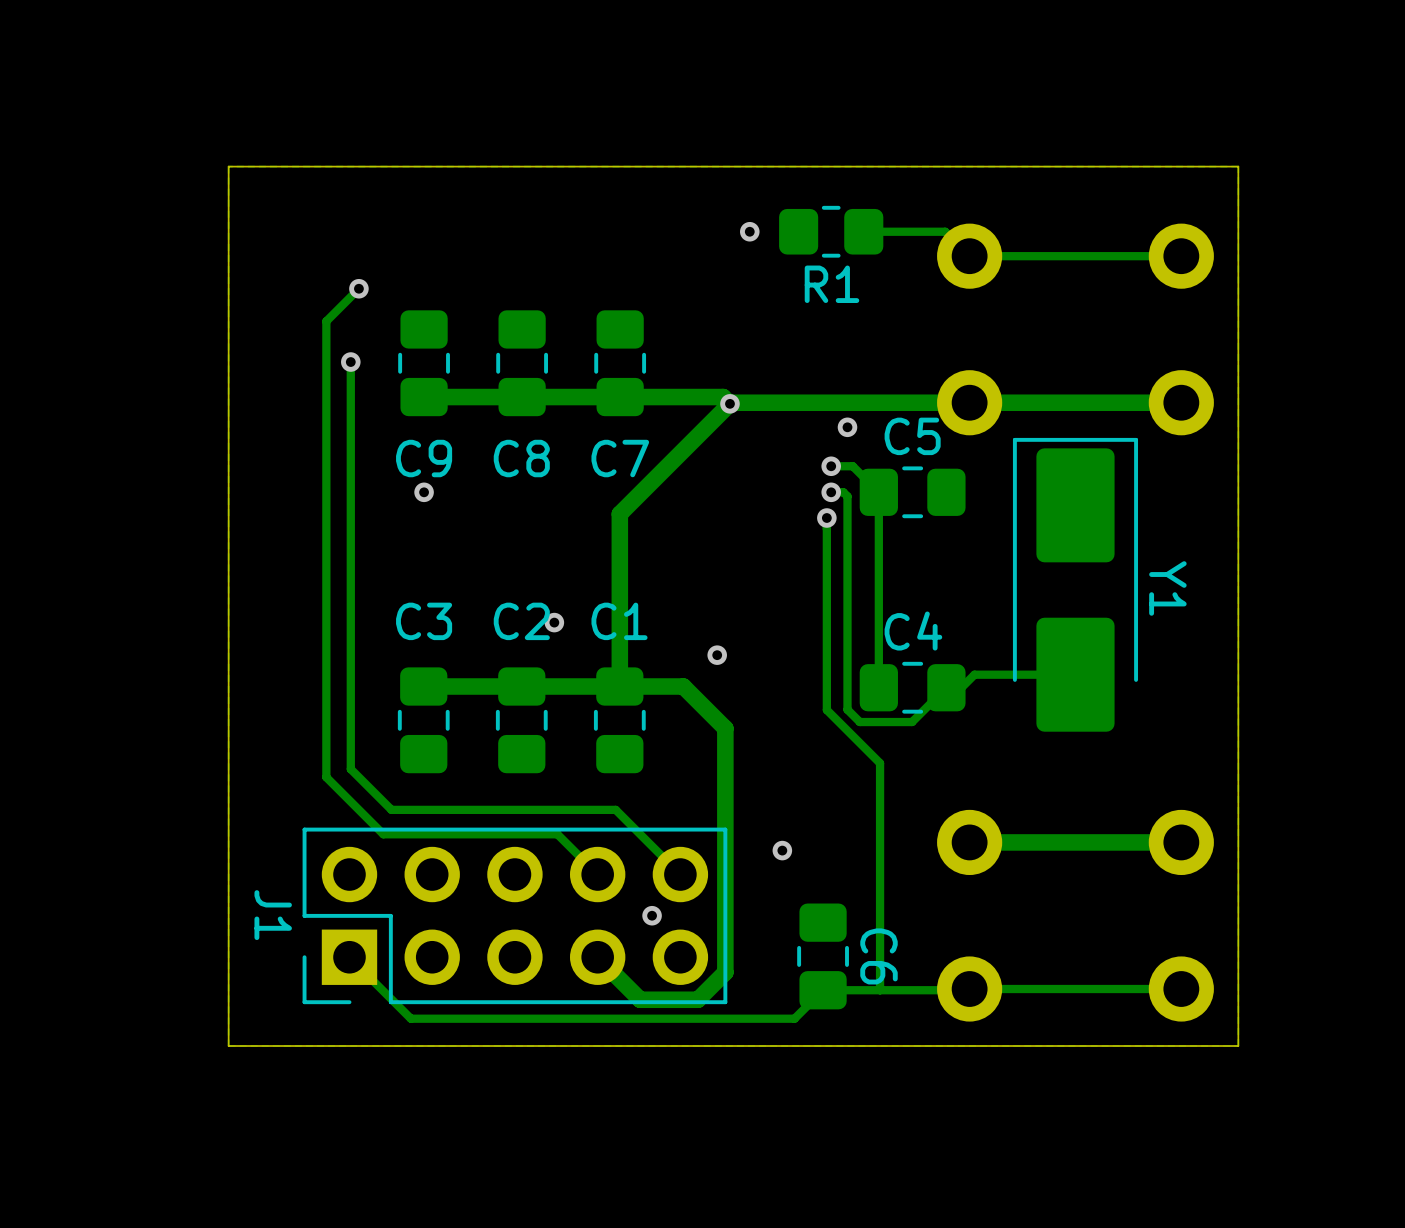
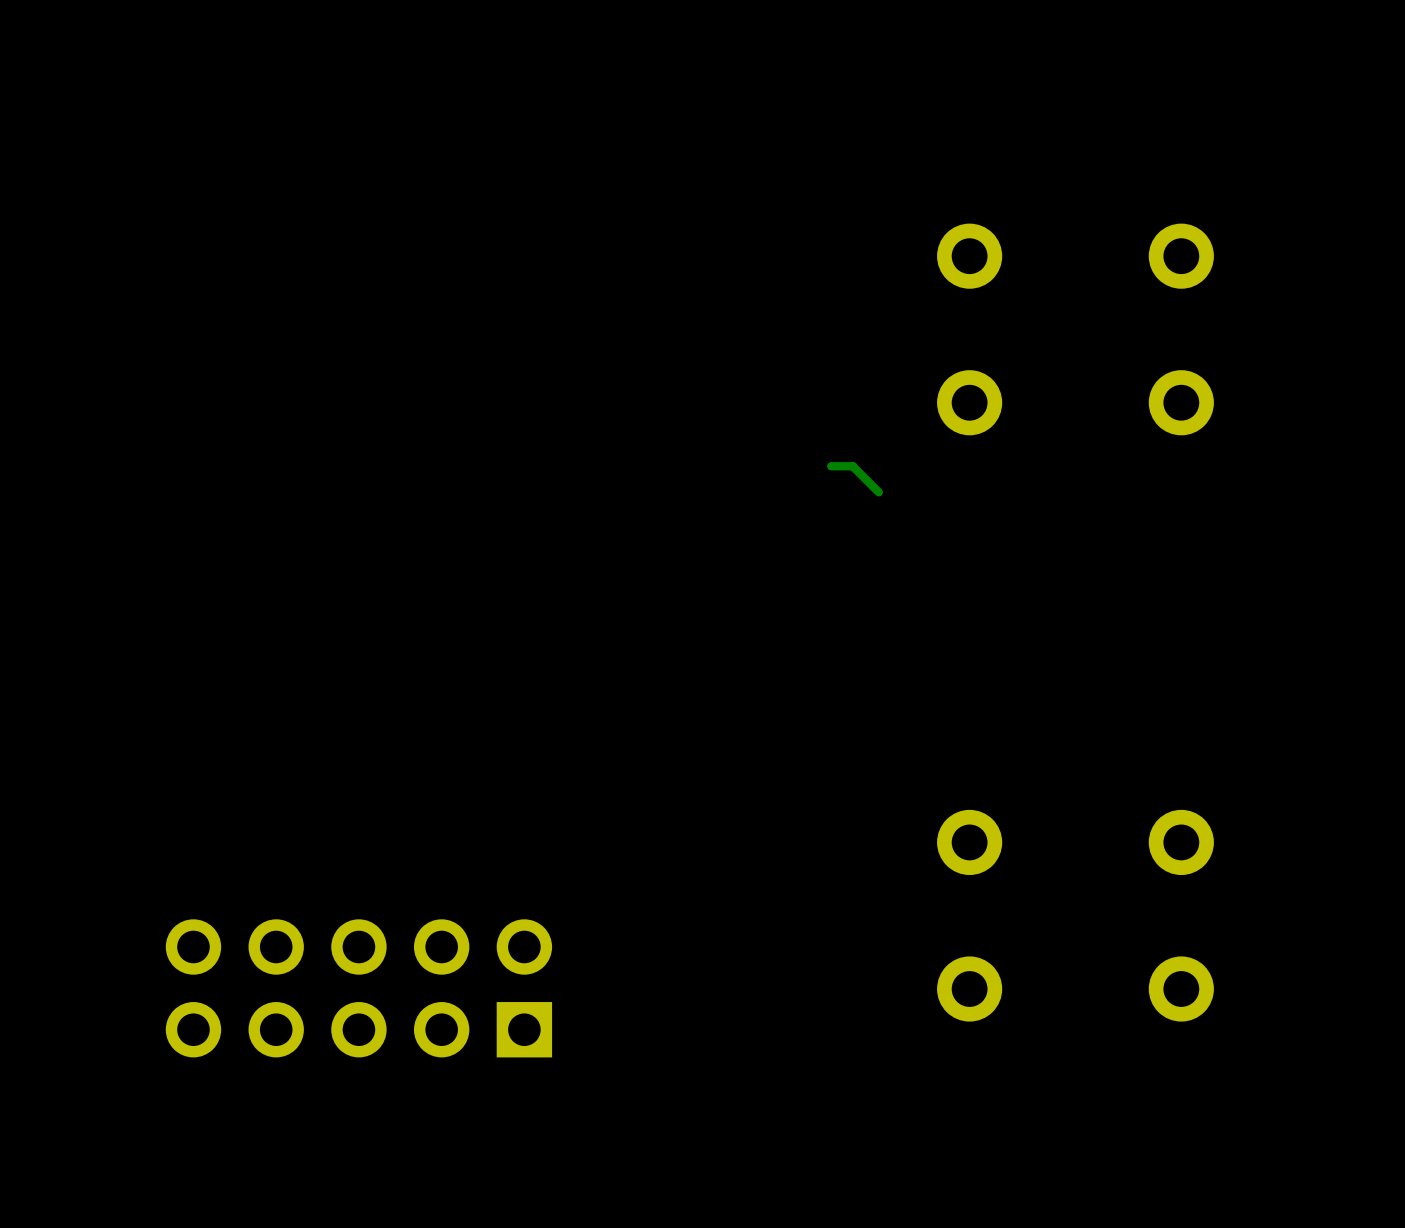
board edge: (1238, 166) (228, 166) (228, 1046) (1238, 1046) (1238, 166) -> none
via: (749, 231) -> none
R1: (831, 231) -> none
track: (863, 231) (945, 231) (969, 256) (1181, 256) -> none
track: (358, 288) (326, 321) (326, 777) (383, 834) (557, 834) (597, 874) -> none
via: (358, 288) -> none
track: (350, 362) (350, 769) (391, 809) (615, 809) (680, 874) -> none
via: (350, 362) -> none
C9: (424, 363) -> none
C8: (522, 363) -> none
C7: (620, 363) -> none
track: (424, 397) (723, 397) (729, 403) -> none
track: (1179, 401) (1181, 402) (731, 402) (619, 513) (619, 686) -> none
via: (729, 403) -> none
via: (847, 427) -> none
via: (831, 466) -> none
track: (878, 482) (878, 687) -> none
via: (424, 492) -> none
track: (831, 492) (843, 492) (847, 496) (847, 709) (859, 722) (912, 722) (946, 687) (961, 687) (974, 674) (1075, 674) (1062, 687) -> none
via: (831, 492) -> none
C5: (912, 492) -> none
track: (826, 518) (826, 710) (880, 763) (880, 990) -> none
via: (826, 518) -> none
Y1: (1075, 584) -> none
via: (554, 622) -> none
via: (717, 655) -> none
track: (423, 686) (683, 686) (725, 728) (725, 972) (698, 999) (640, 999) (597, 957) -> none
C4: (912, 687) -> none
C3: (423, 720) -> none
C2: (521, 720) -> none
C1: (619, 720) -> none
track: (1173, 842) (961, 842) -> none
via: (782, 850) -> none
J1 side: bottom (514, 915) -> top (358, 988)
via: (652, 915) -> none
C6: (823, 956) -> none
track: (349, 957) (410, 1018) (794, 1018) (831, 982) -> none
track: (1173, 989) (823, 990) -> none

